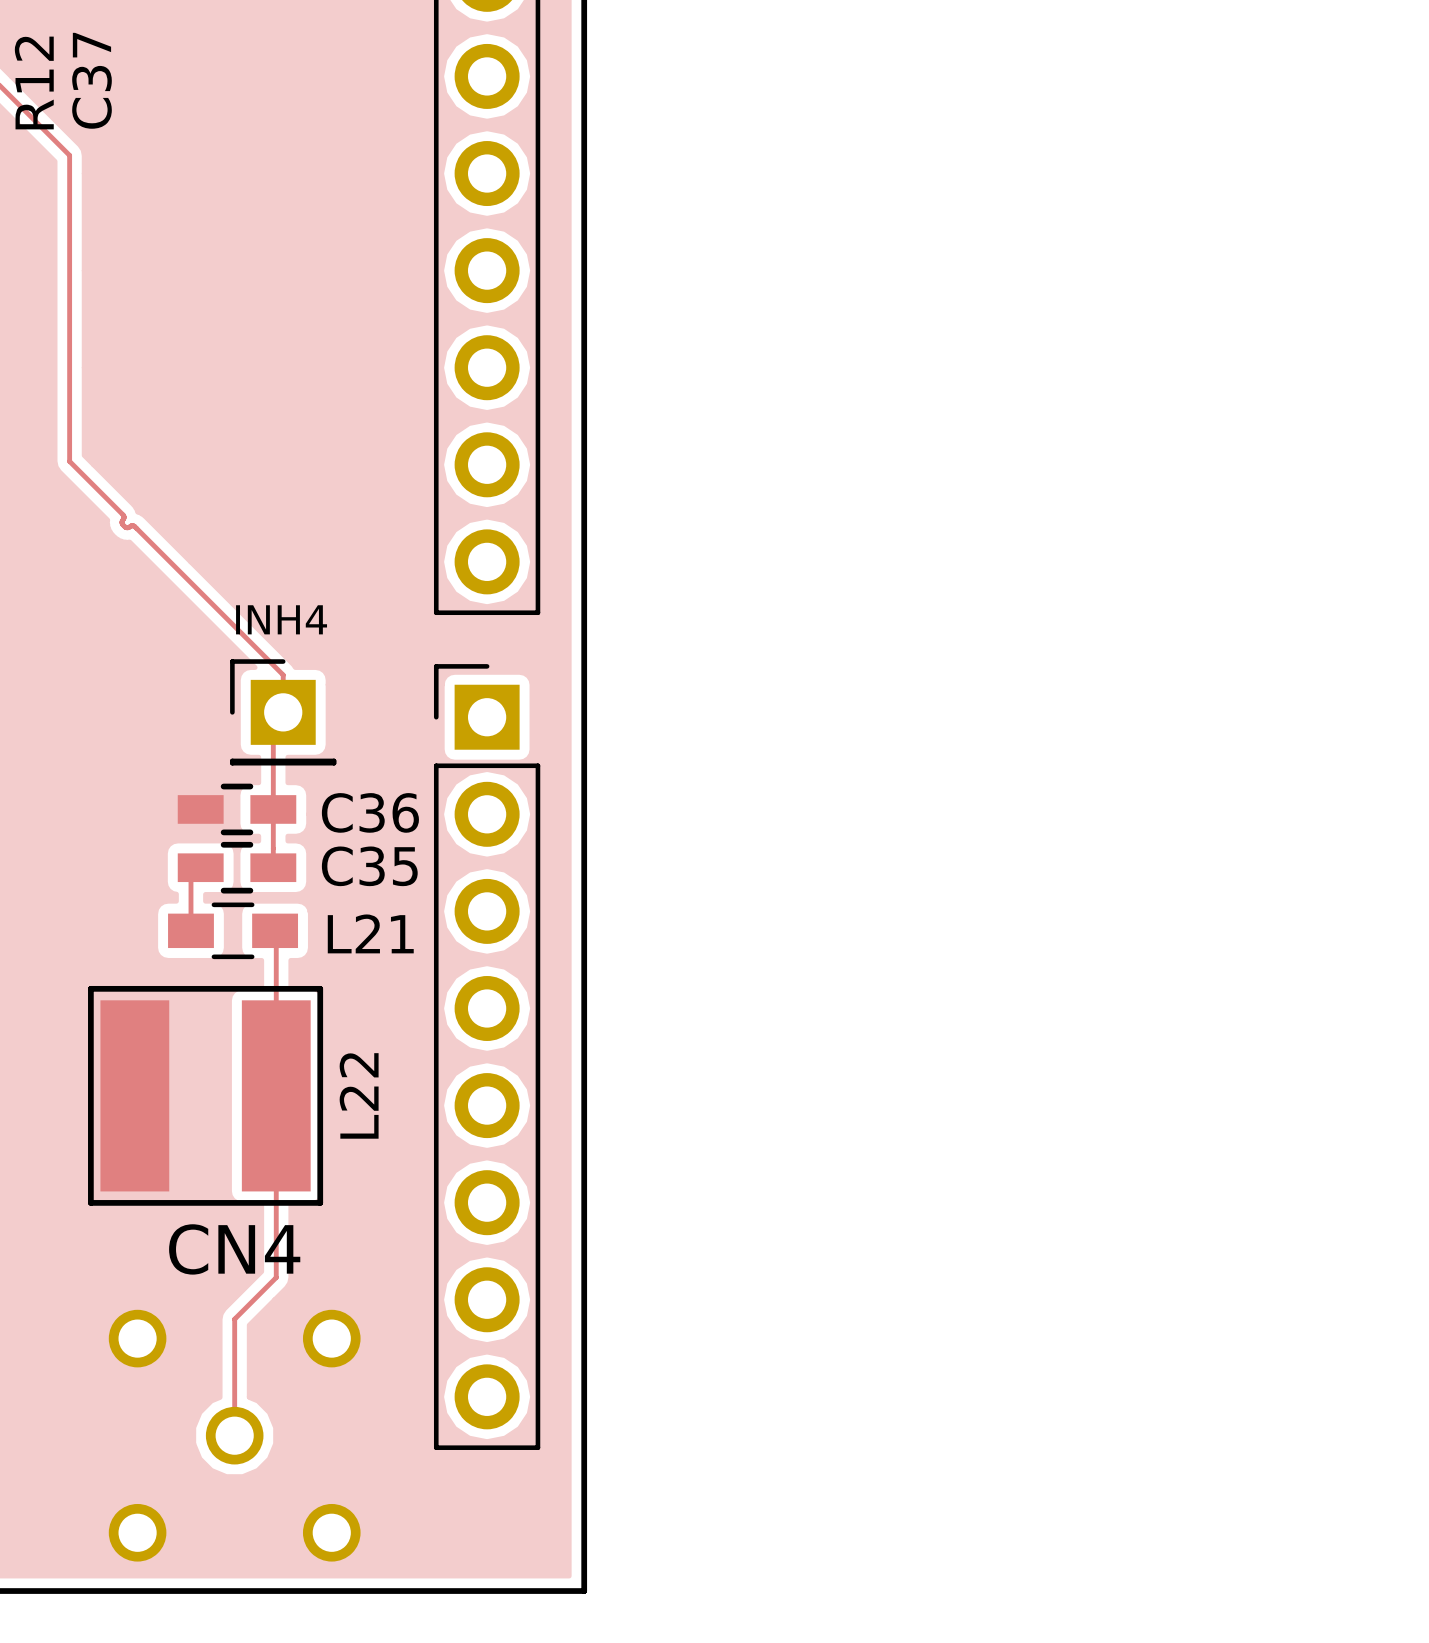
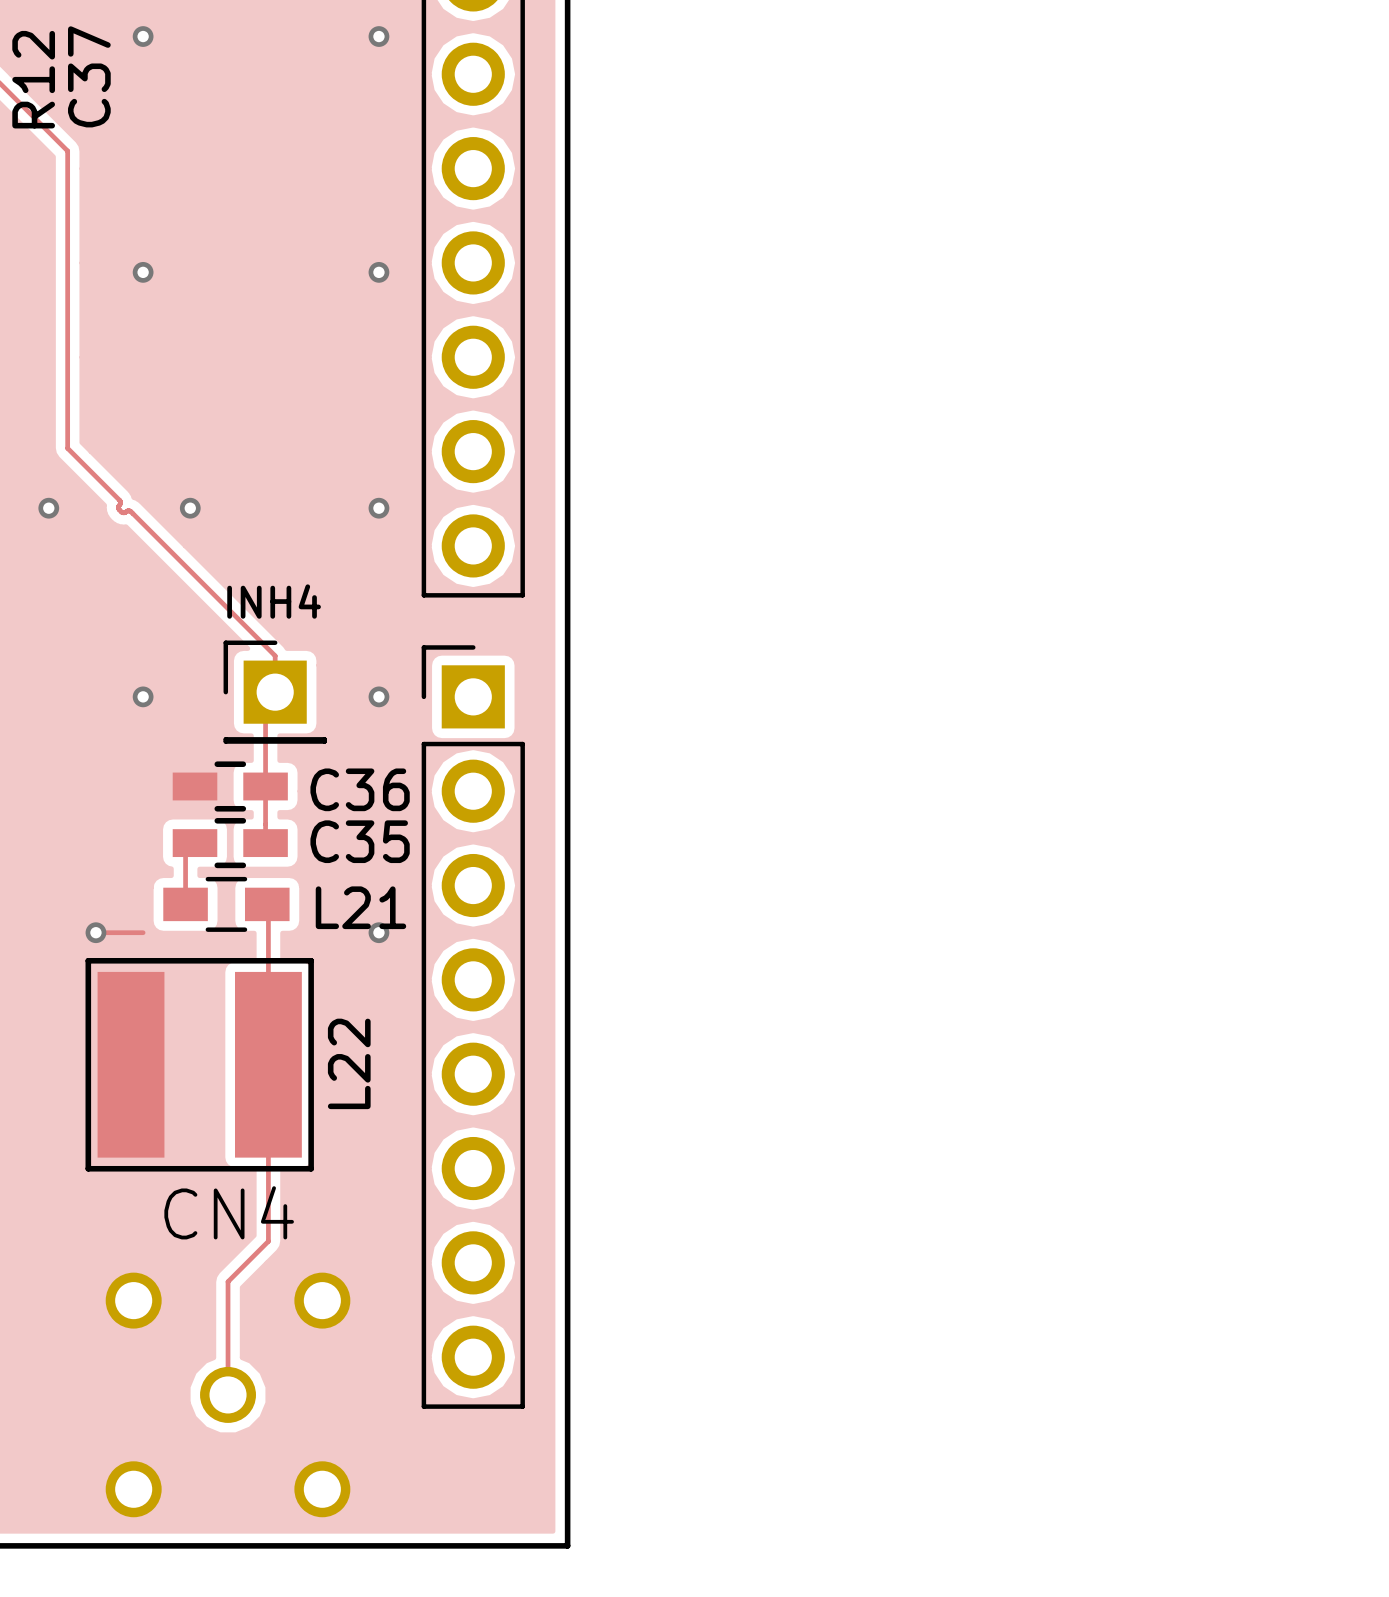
via: none -> (143, 36)
via: none -> (378, 36)
via: none -> (143, 272)
via: none -> (378, 272)
via: none -> (48, 508)
via: none -> (190, 508)
via: none -> (378, 508)
via: none -> (143, 696)
via: none -> (378, 696)
track: none -> (95, 932) (143, 932)
via: none -> (95, 932)
via: none -> (378, 932)

